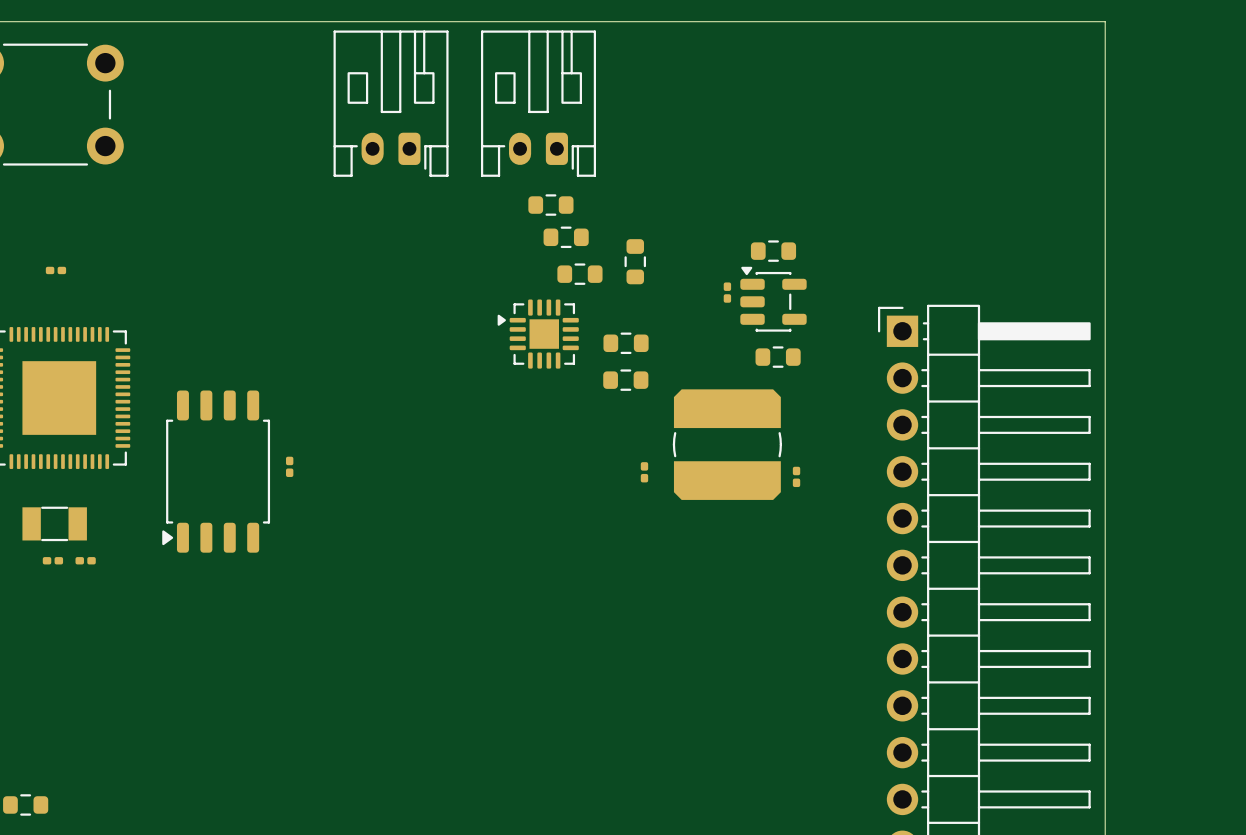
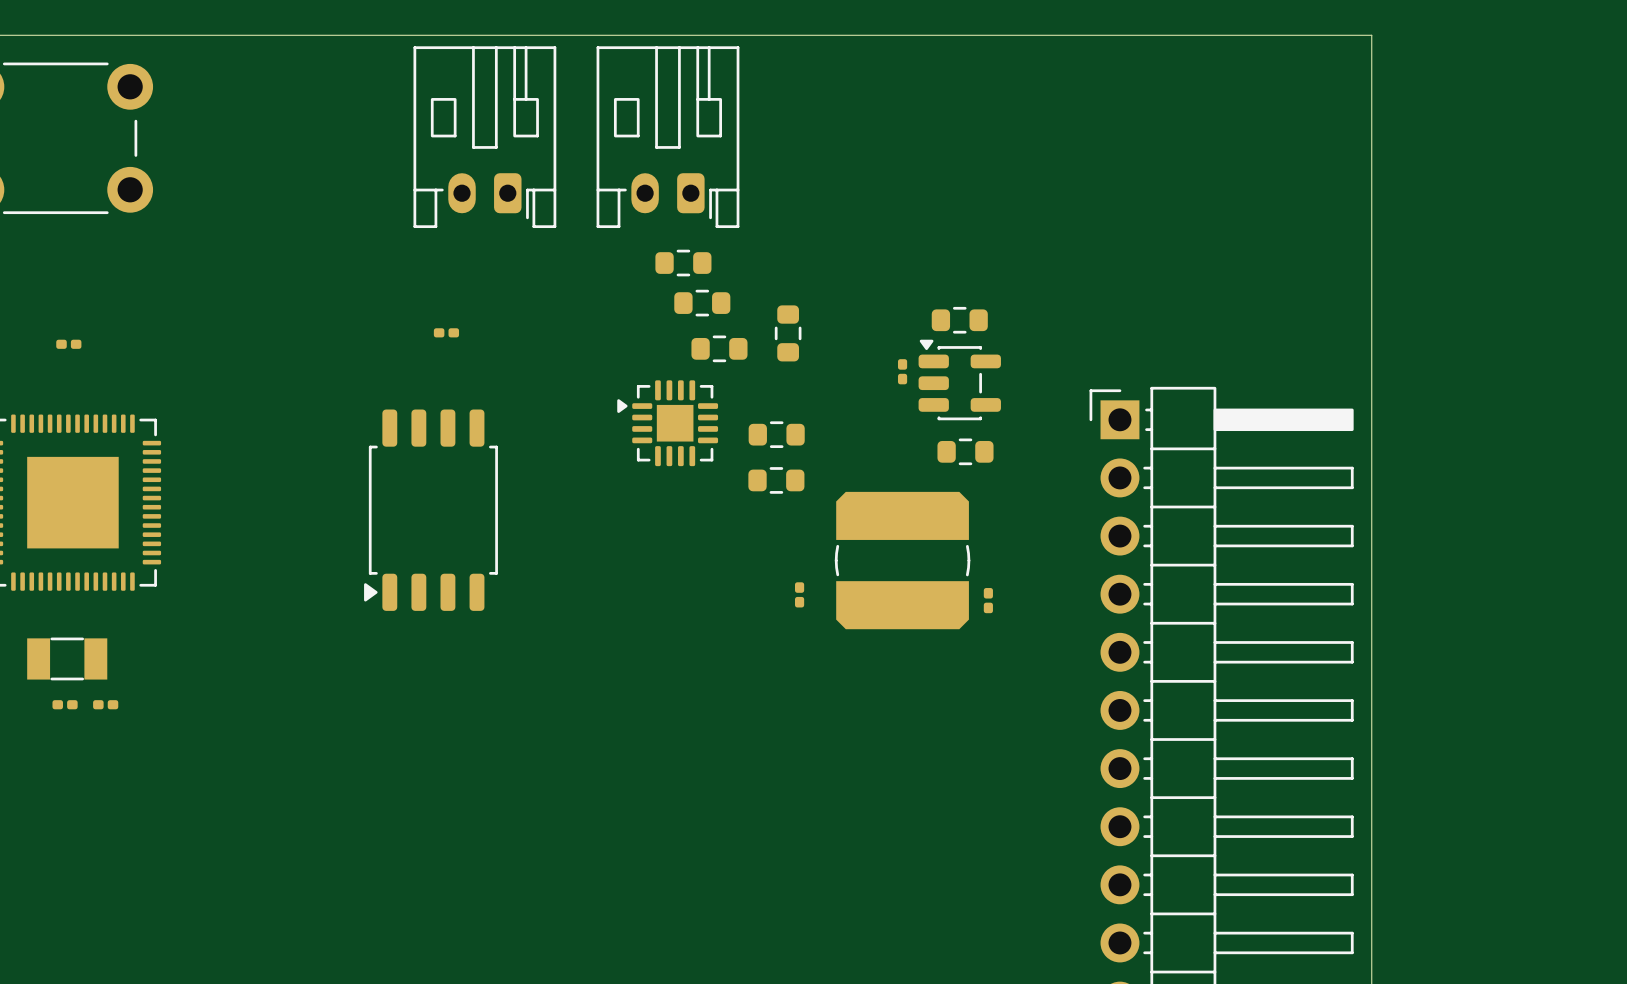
part rotation: 0° (289, 466) -> 90° clockwise (446, 332)
part position: (289, 466) -> (446, 332)
part position: (216, 471) -> (431, 510)

